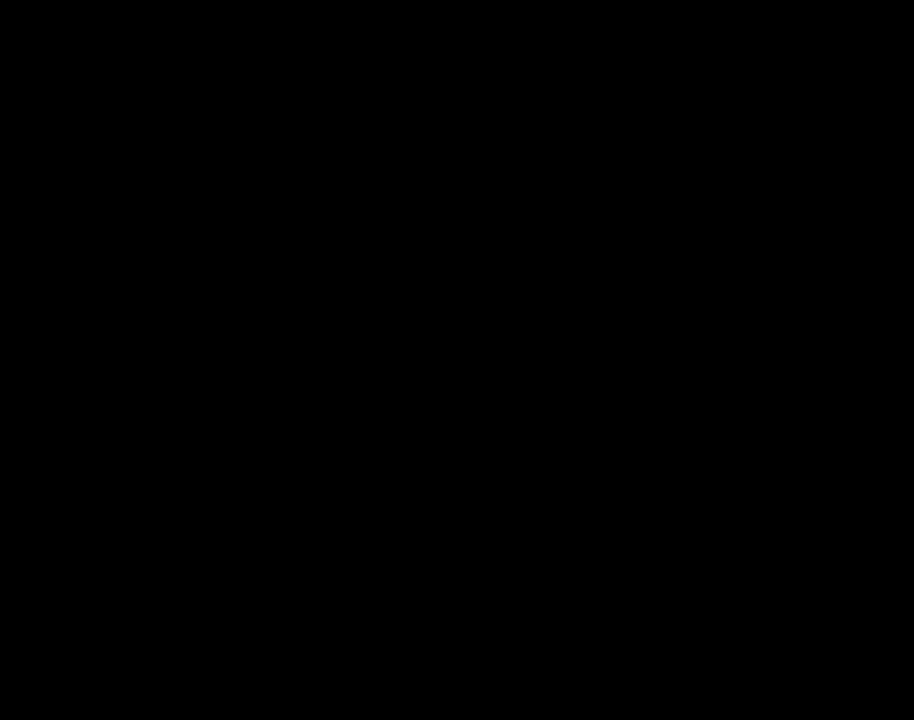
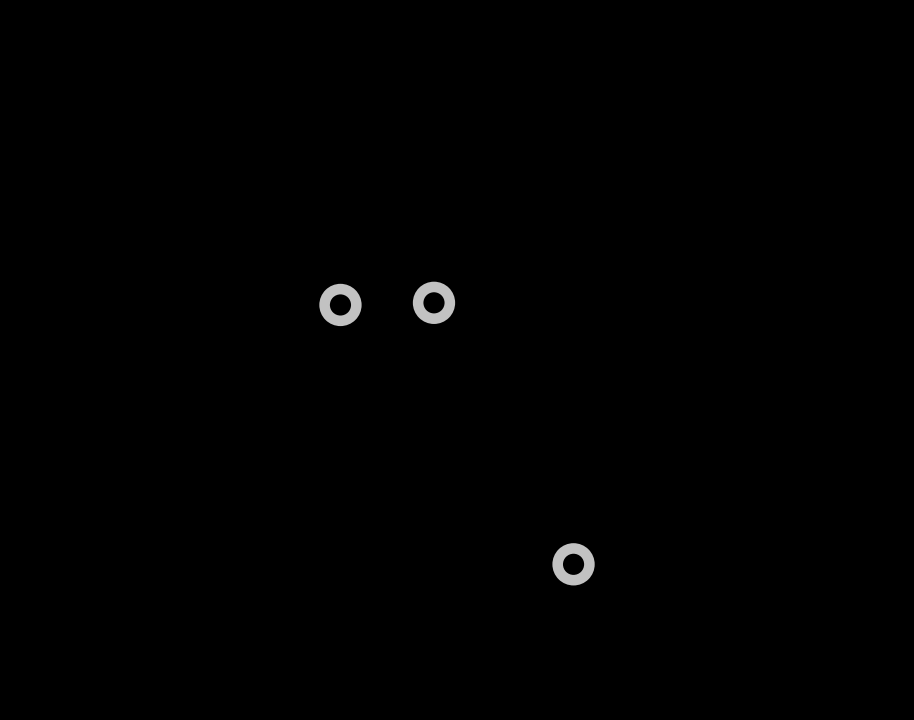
via: none -> (433, 302)
via: none -> (340, 304)
via: none -> (573, 564)

